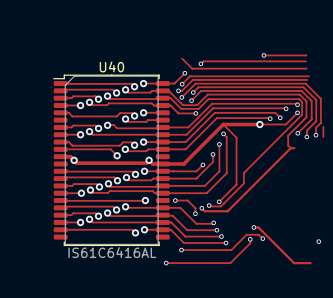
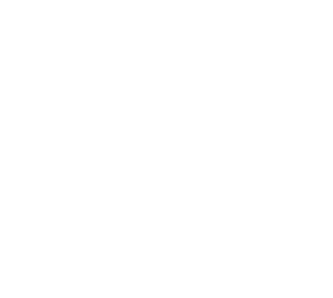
track: (263, 55) (306, 55) -> none
via: (263, 55) -> none
track: (182, 58) (192, 68) (306, 68) -> none
track: (305, 61) (203, 61) (200, 63) -> none
via: (200, 63) -> none
track: (184, 73) (174, 83) (143, 83) -> none
via: (184, 73) -> none
track: (308, 76) (190, 76) (182, 84) -> none
track: (307, 79) (192, 79) (181, 90) (178, 90) -> none
track: (60, 83) (131, 83) (134, 86) -> none
via: (143, 83) -> none
via: (182, 84) -> none
via: (134, 86) -> none
track: (61, 89) (113, 89) (116, 92) -> none
track: (125, 89) (128, 92) (168, 90) (183, 105) (197, 105) (207, 94) (299, 94) (306, 101) (306, 117) (288, 135) (288, 145) (290, 148) -> none
via: (125, 89) -> none
via: (178, 90) -> none
via: (116, 92) -> none
track: (193, 92) (198, 87) (303, 87) (316, 100) (316, 121) (306, 130) (306, 136) -> none
via: (193, 92) -> none
track: (107, 96) (110, 99) (161, 99) -> none
via: (107, 96) -> none
track: (181, 97) (195, 83) (305, 83) (320, 98) (320, 123) (316, 127) (316, 135) -> none
via: (181, 97) -> none
track: (60, 98) (95, 96) (98, 99) -> none
track: (162, 98) (170, 98) (181, 108) (198, 108) (208, 99) (299, 99) (302, 102) (302, 114) (243, 173) (243, 183) (221, 206) (209, 205) -> none
via: (98, 99) -> none
track: (191, 100) (201, 90) (301, 90) (311, 100) (311, 119) (297, 133) -> none
via: (191, 100) -> none
track: (89, 102) (92, 105) (151, 103) (153, 105) (170, 105) (178, 113) (195, 113) -> none
via: (89, 102) -> none
track: (297, 104) (212, 103) (188, 127) (162, 127) -> none
via: (297, 104) -> none
track: (60, 105) (80, 105) -> none
via: (80, 105) -> none
track: (286, 108) (213, 108) (186, 134) (92, 134) (89, 131) -> none
via: (286, 108) -> none
track: (60, 112) (68, 112) (72, 116) (116, 116) (120, 113) (131, 113) (134, 115) -> none
track: (143, 112) (162, 112) -> none
via: (143, 112) -> none
track: (297, 112) (285, 124) (223, 124) -> none
via: (297, 112) -> none
via: (195, 113) -> none
via: (134, 115) -> none
track: (280, 117) (275, 112) (214, 112) (185, 142) (143, 142) -> none
via: (280, 117) -> none
track: (270, 118) (216, 118) (185, 149) (148, 149) (146, 151) (127, 151) (125, 149) -> none
via: (270, 118) -> none
track: (125, 119) (128, 121) (162, 120) -> none
via: (125, 119) -> none
track: (223, 124) (236, 137) (236, 184) (219, 201) -> none
track: (223, 124) (183, 163) (152, 163) (149, 160) (146, 163) (76, 163) (70, 156) (60, 156) -> none
via: (259, 124) -> none
track: (107, 125) (113, 125) (117, 128) (161, 128) -> none
via: (107, 125) -> none
track: (323, 126) (323, 136) -> none
track: (60, 127) (95, 125) (98, 128) -> none
via: (98, 128) -> none
via: (89, 131) -> none
track: (223, 133) (226, 137) (226, 173) (206, 193) (154, 193) (152, 191) (93, 192) (90, 190) -> none
via: (223, 133) -> none
via: (297, 133) -> none
track: (60, 134) (80, 134) -> none
via: (80, 134) -> none
via: (316, 135) -> none
via: (306, 136) -> none
track: (60, 142) (68, 142) (72, 145) (119, 145) (123, 142) (131, 142) (134, 145) -> none
via: (143, 142) -> none
track: (219, 144) (219, 171) (204, 185) (162, 185) -> none
via: (219, 144) -> none
via: (134, 145) -> none
track: (290, 148) (294, 148) -> none
track: (290, 148) (227, 211) (204, 211) (201, 208) -> none
track: (60, 149) (110, 149) (117, 155) -> none
via: (125, 149) -> none
track: (213, 154) (213, 162) (196, 178) (129, 180) (126, 177) -> none
via: (213, 154) -> none
via: (117, 155) -> none
via: (74, 160) -> none
U40: IS61C6416AL (111, 160) -> none
via: (149, 160) -> none
track: (202, 164) (196, 171) (173, 171) -> none
via: (202, 164) -> none
track: (61, 171) (132, 171) (135, 174) -> none
track: (144, 171) (173, 171) -> none
via: (144, 171) -> none
via: (135, 174) -> none
track: (62, 177) (114, 177) (117, 180) -> none
via: (126, 177) -> none
via: (117, 180) -> none
track: (108, 183) (111, 186) (162, 186) -> none
via: (108, 183) -> none
track: (61, 185) (96, 184) (99, 186) -> none
via: (99, 186) -> none
via: (90, 190) -> none
track: (61, 193) (81, 193) -> none
via: (81, 193) -> none
track: (145, 200) (60, 200) -> none
via: (145, 200) -> none
track: (175, 200) (187, 200) (195, 208) (195, 213) -> none
via: (175, 200) -> none
via: (219, 201) -> none
via: (209, 205) -> none
track: (61, 206) (113, 206) (116, 209) -> none
track: (125, 206) (180, 207) (196, 223) (213, 222) -> none
via: (125, 206) -> none
via: (201, 208) -> none
via: (116, 209) -> none
track: (107, 213) (110, 216) (161, 216) -> none
via: (107, 213) -> none
via: (195, 213) -> none
track: (60, 215) (95, 213) (98, 216) -> none
track: (162, 215) (172, 215) (187, 230) (216, 230) -> none
via: (98, 216) -> none
track: (89, 219) (92, 222) (171, 222) (185, 236) (221, 236) -> none
via: (89, 219) -> none
track: (60, 222) (80, 222) -> none
via: (80, 222) -> none
via: (213, 222) -> none
track: (253, 227) (258, 227) (294, 263) (310, 263) -> none
via: (253, 227) -> none
track: (61, 229) (132, 229) (135, 232) -> none
track: (144, 229) (170, 229) (184, 242) (226, 242) -> none
via: (144, 229) -> none
via: (216, 230) -> none
via: (135, 232) -> none
via: (221, 236) -> none
track: (262, 238) (259, 234) (246, 234) (231, 250) (181, 250) -> none
via: (262, 238) -> none
track: (250, 239) (250, 243) (230, 263) (166, 263) -> none
via: (250, 239) -> none
via: (318, 241) -> none
via: (226, 242) -> none
via: (181, 250) -> none
via: (166, 263) -> none

